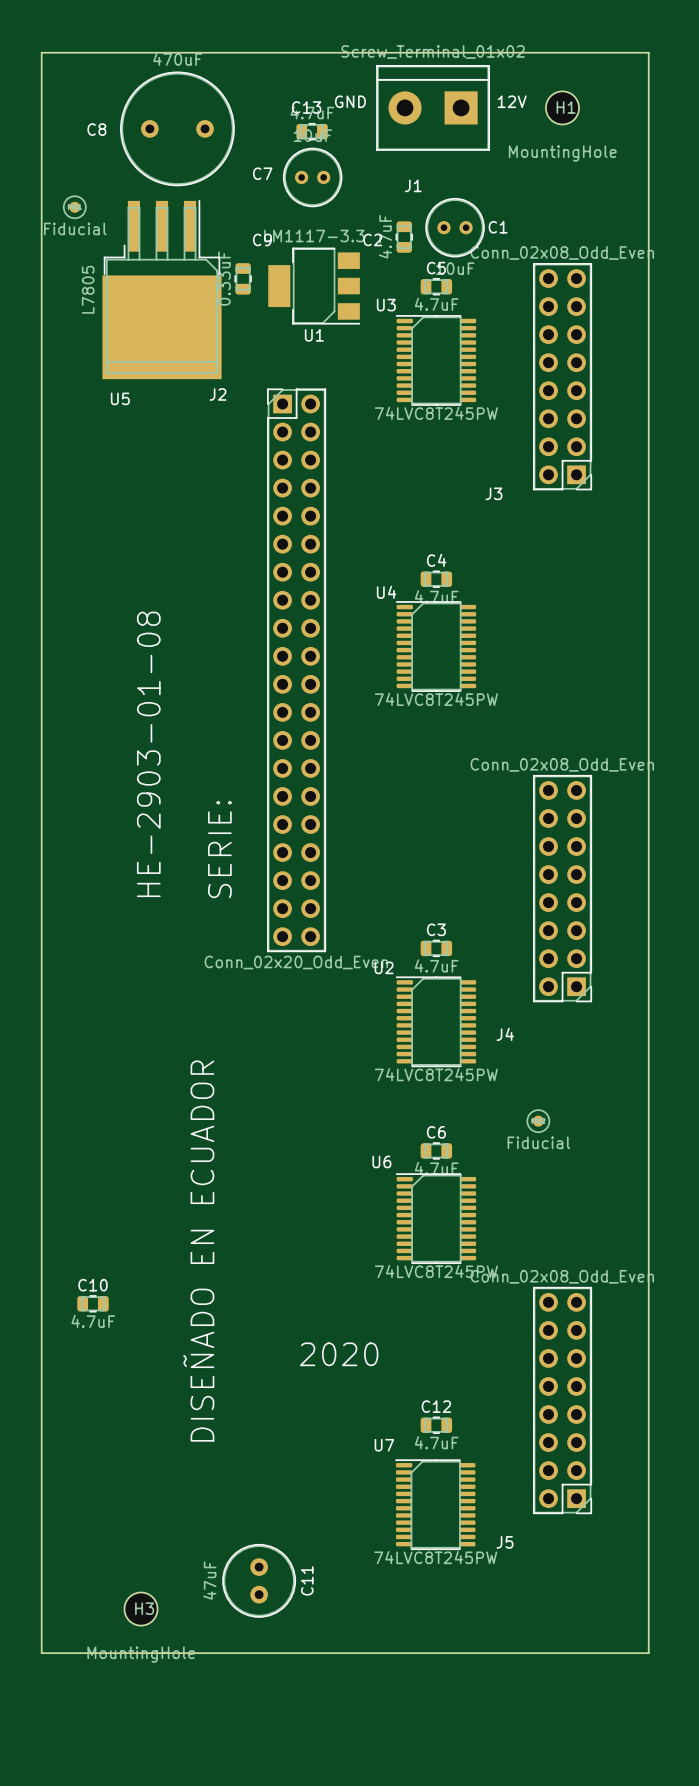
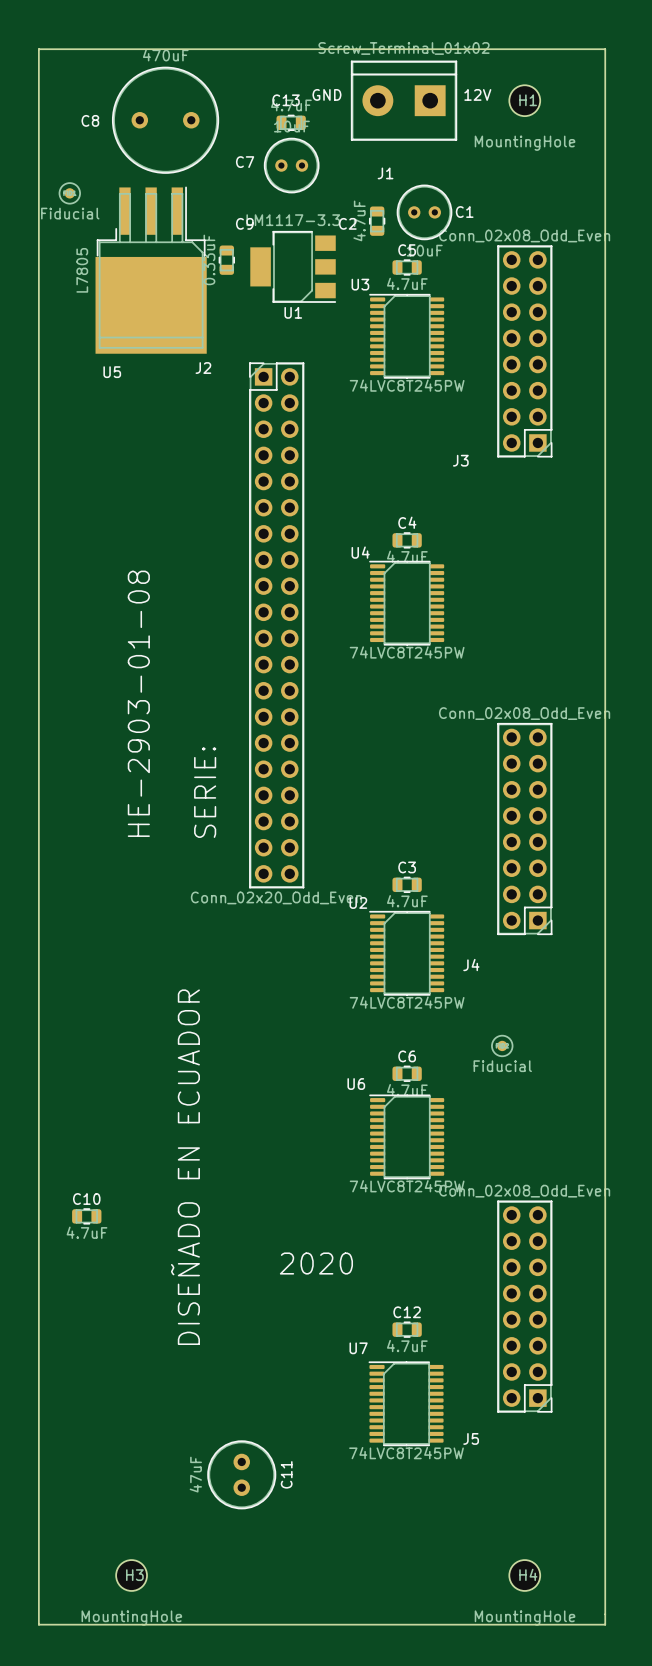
H3 position: (141, 1609) -> (131, 1575)
board edge: (41, 1653) (648, 1653) -> (38, 1542) (38, 1624) (605, 1624) (605, 1542)
H4: none -> MountingHole (524, 1575)

